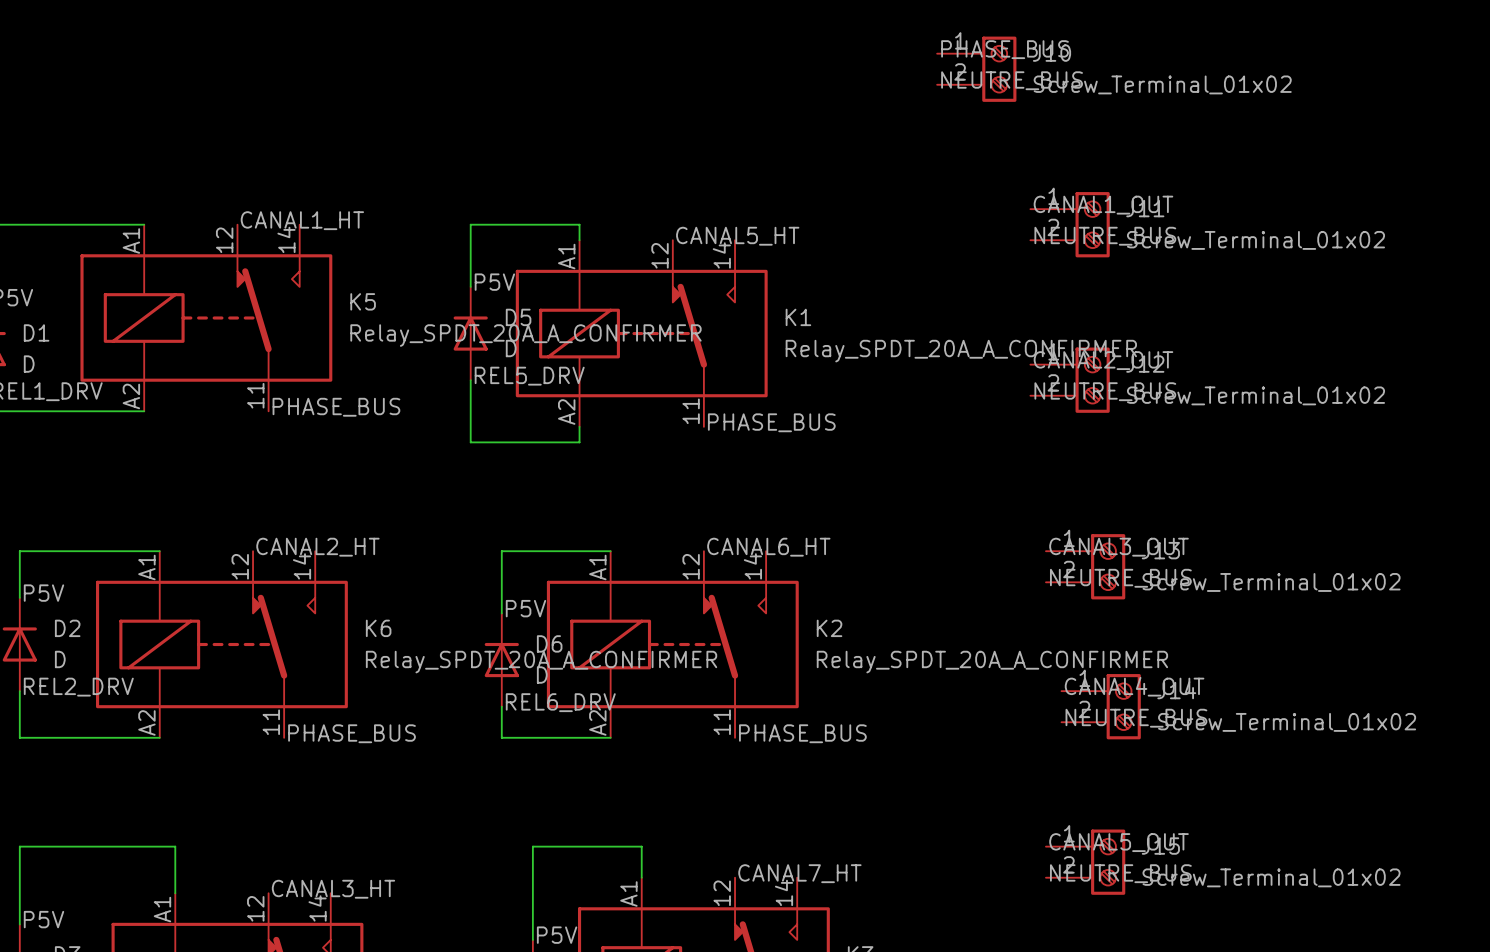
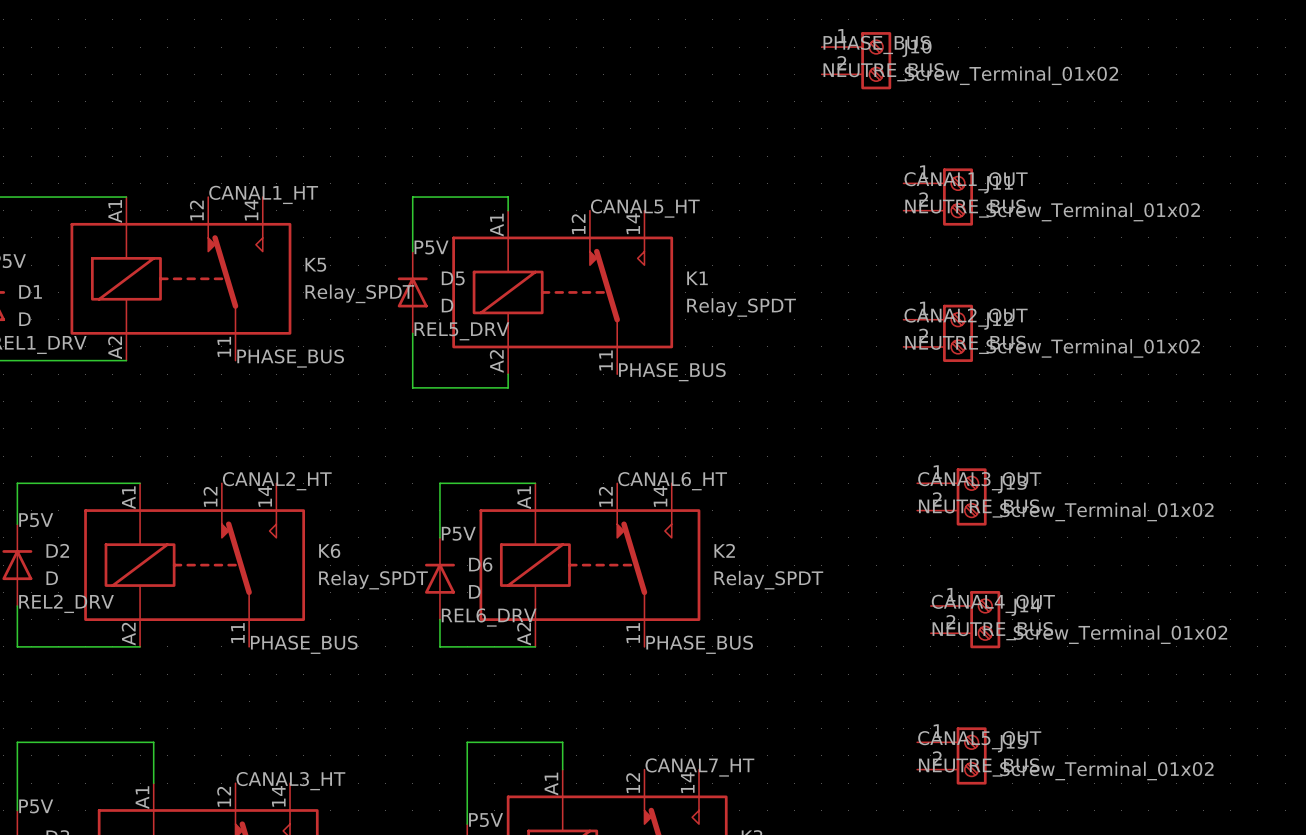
K5 value: Relay_SPDT_20A_A_CONFIRMER (525, 335) -> Relay_SPDT (359, 293)
K1 value: Relay_SPDT_20A_A_CONFIRMER (961, 351) -> Relay_SPDT (741, 307)
K6 value: Relay_SPDT_20A_A_CONFIRMER (541, 662) -> Relay_SPDT (373, 580)
K2 value: Relay_SPDT_20A_A_CONFIRMER (992, 662) -> Relay_SPDT (768, 580)

